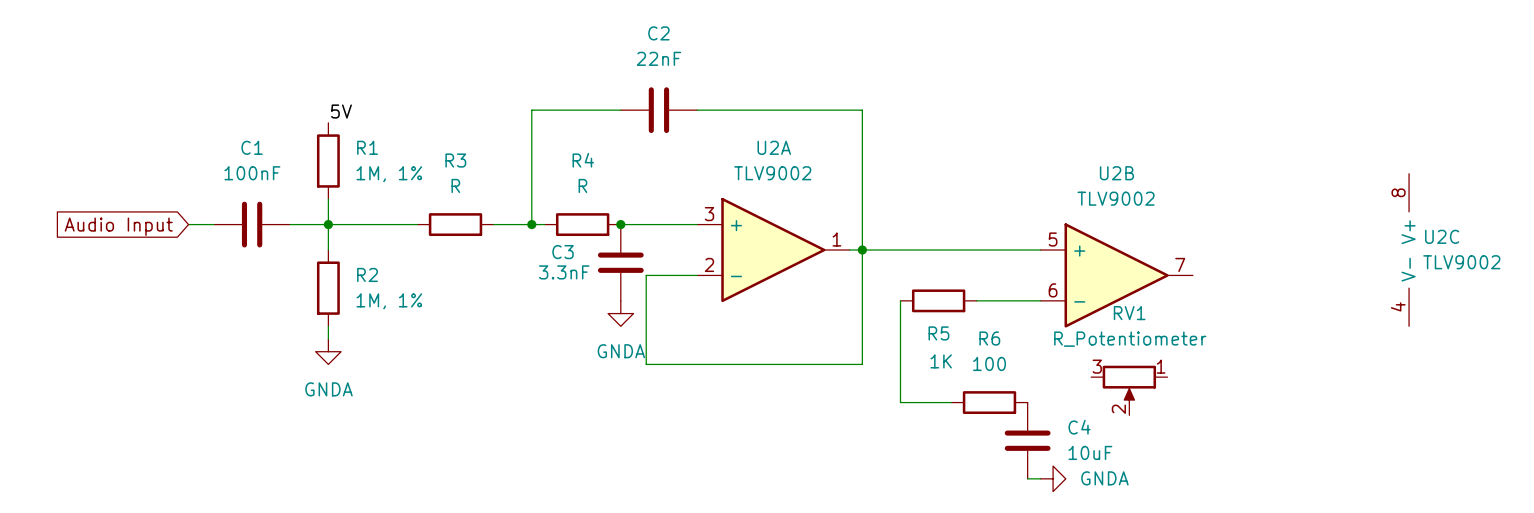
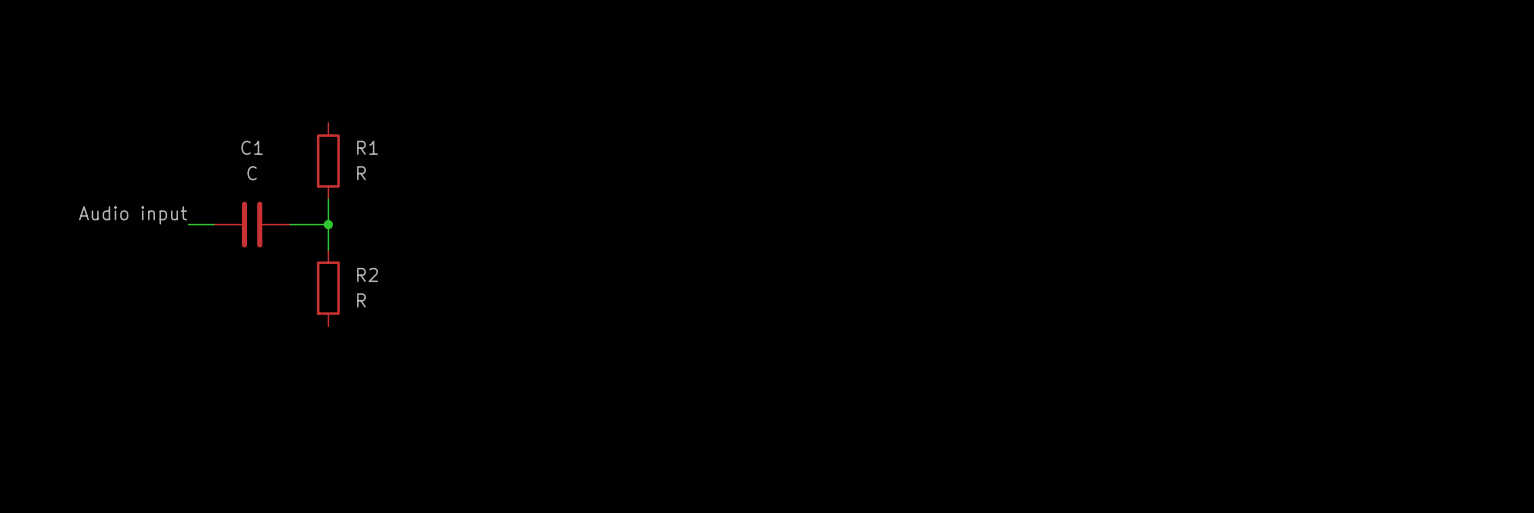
wire: (620, 110) (531, 110) (531, 224) -> none
C2: 22nF (658, 110) -> none
wire: (697, 110) (862, 110) (862, 364) (646, 364) (646, 275) (697, 275) -> none
label: 5V (341, 111) -> none
C1 value: 100nF (252, 173) -> C (252, 173)
R1 value: 1M, 1% (389, 174) -> R (361, 173)
label: none -> Audio input (133, 215)
wire: (328, 224) (417, 224) -> none
R3: R (455, 224) -> none
wire: (493, 224) (544, 224) -> none
junction: (531, 224) -> none
R4: R (582, 224) -> none
wire: (620, 224) (697, 224) -> none
junction: (620, 224) -> none
global label: Audio Input (118, 226) -> none
U2A: TLV9002 (773, 250) -> none
wire: (849, 250) (1040, 250) -> none
junction: (862, 250) -> none
U2C: TLV9002 (1409, 250) -> none
C3: 3.3nF (620, 262) -> none
U2B: TLV9002 (1116, 275) -> none
wire: (900, 300) (900, 402) (951, 402) -> none
R5: 1K (938, 300) -> none
wire: (976, 300) (1040, 300) -> none
R2 value: 1M, 1% (389, 301) -> R (361, 300)
power symbol: GNDA (620, 313) -> none
wire: (328, 326) (328, 339) -> none
power symbol: GNDA (328, 351) -> none
RV1: R_Potentiometer (1129, 390) -> none
R6: 100 (989, 402) -> none
C4: 10uF (1027, 440) -> none
wire: (1027, 478) (1040, 478) -> none
power symbol: GNDA (1053, 478) -> none

